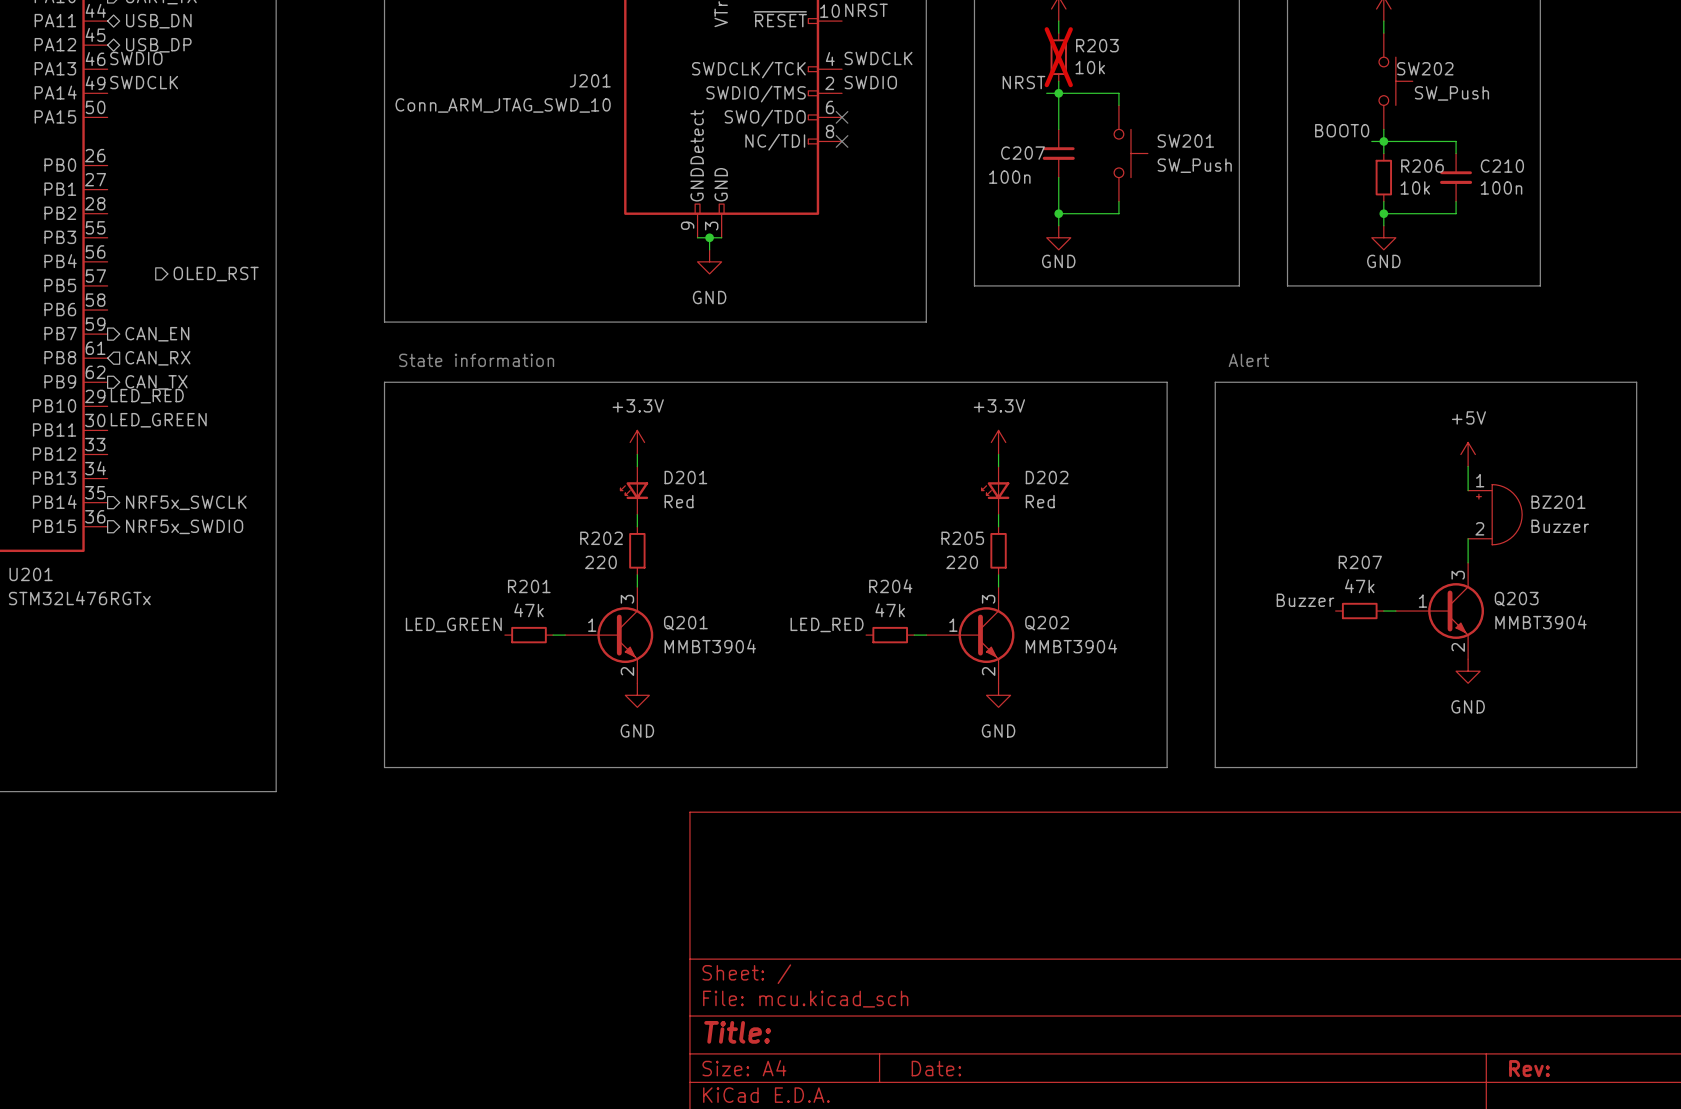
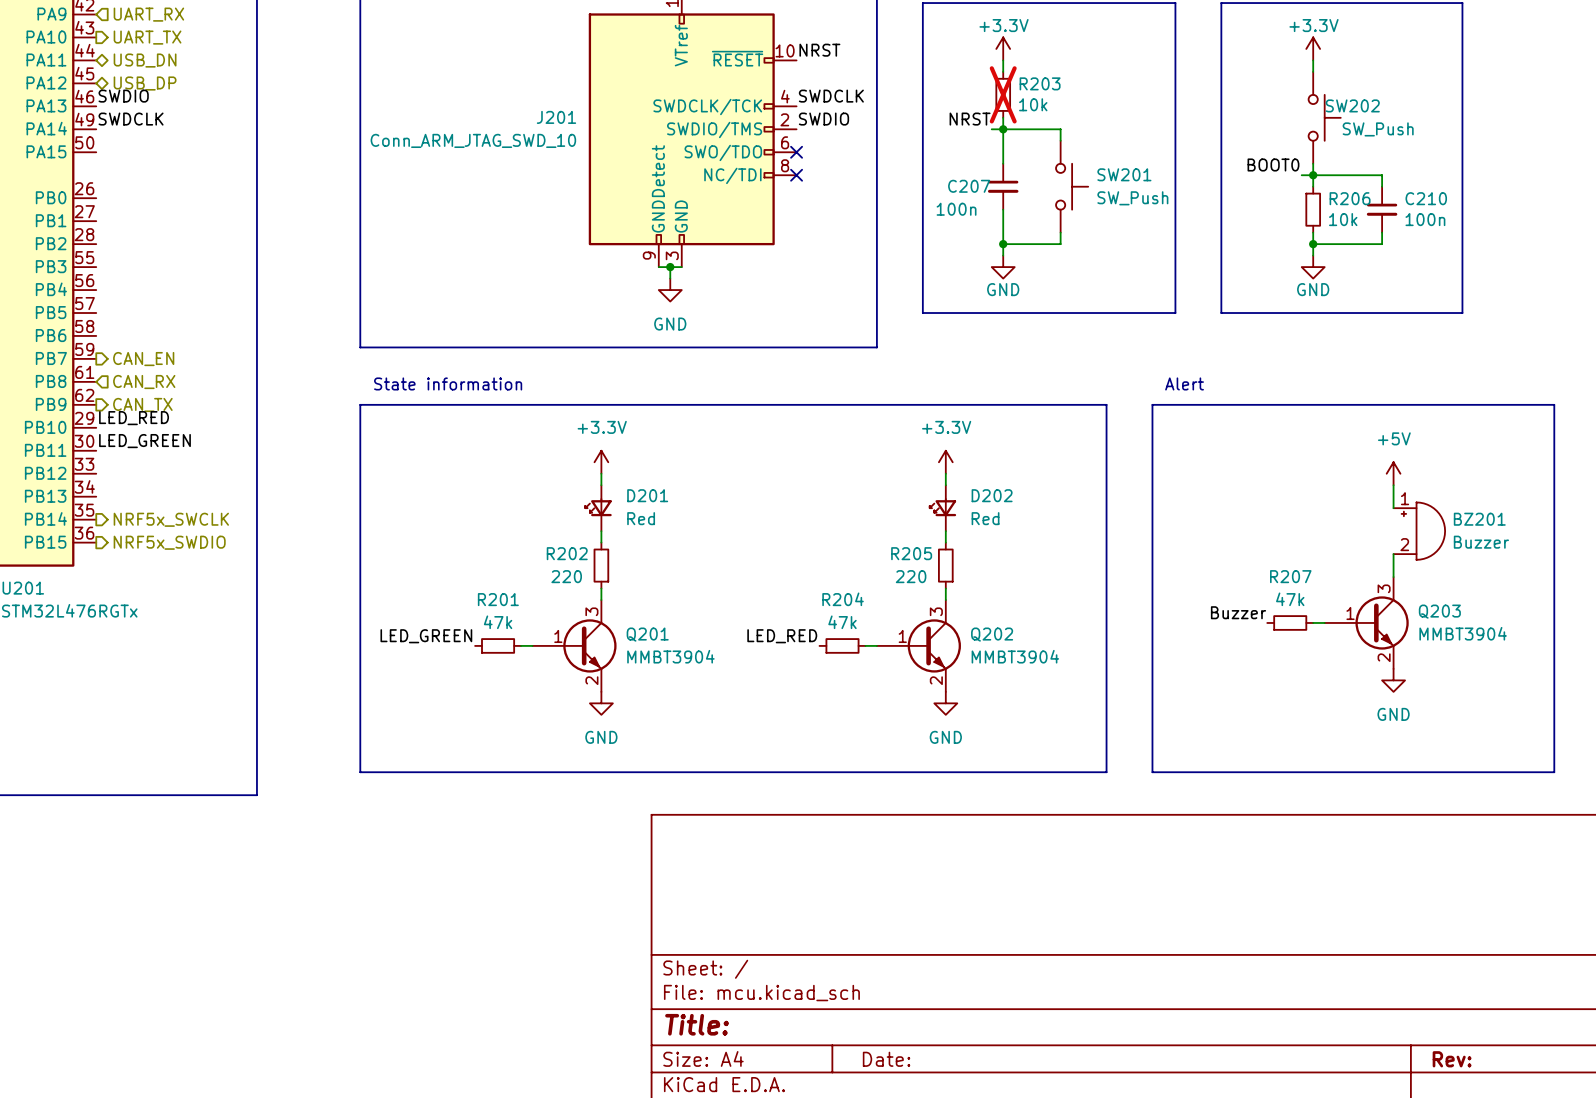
hierarchical label: OLED_RST (216, 274) -> none

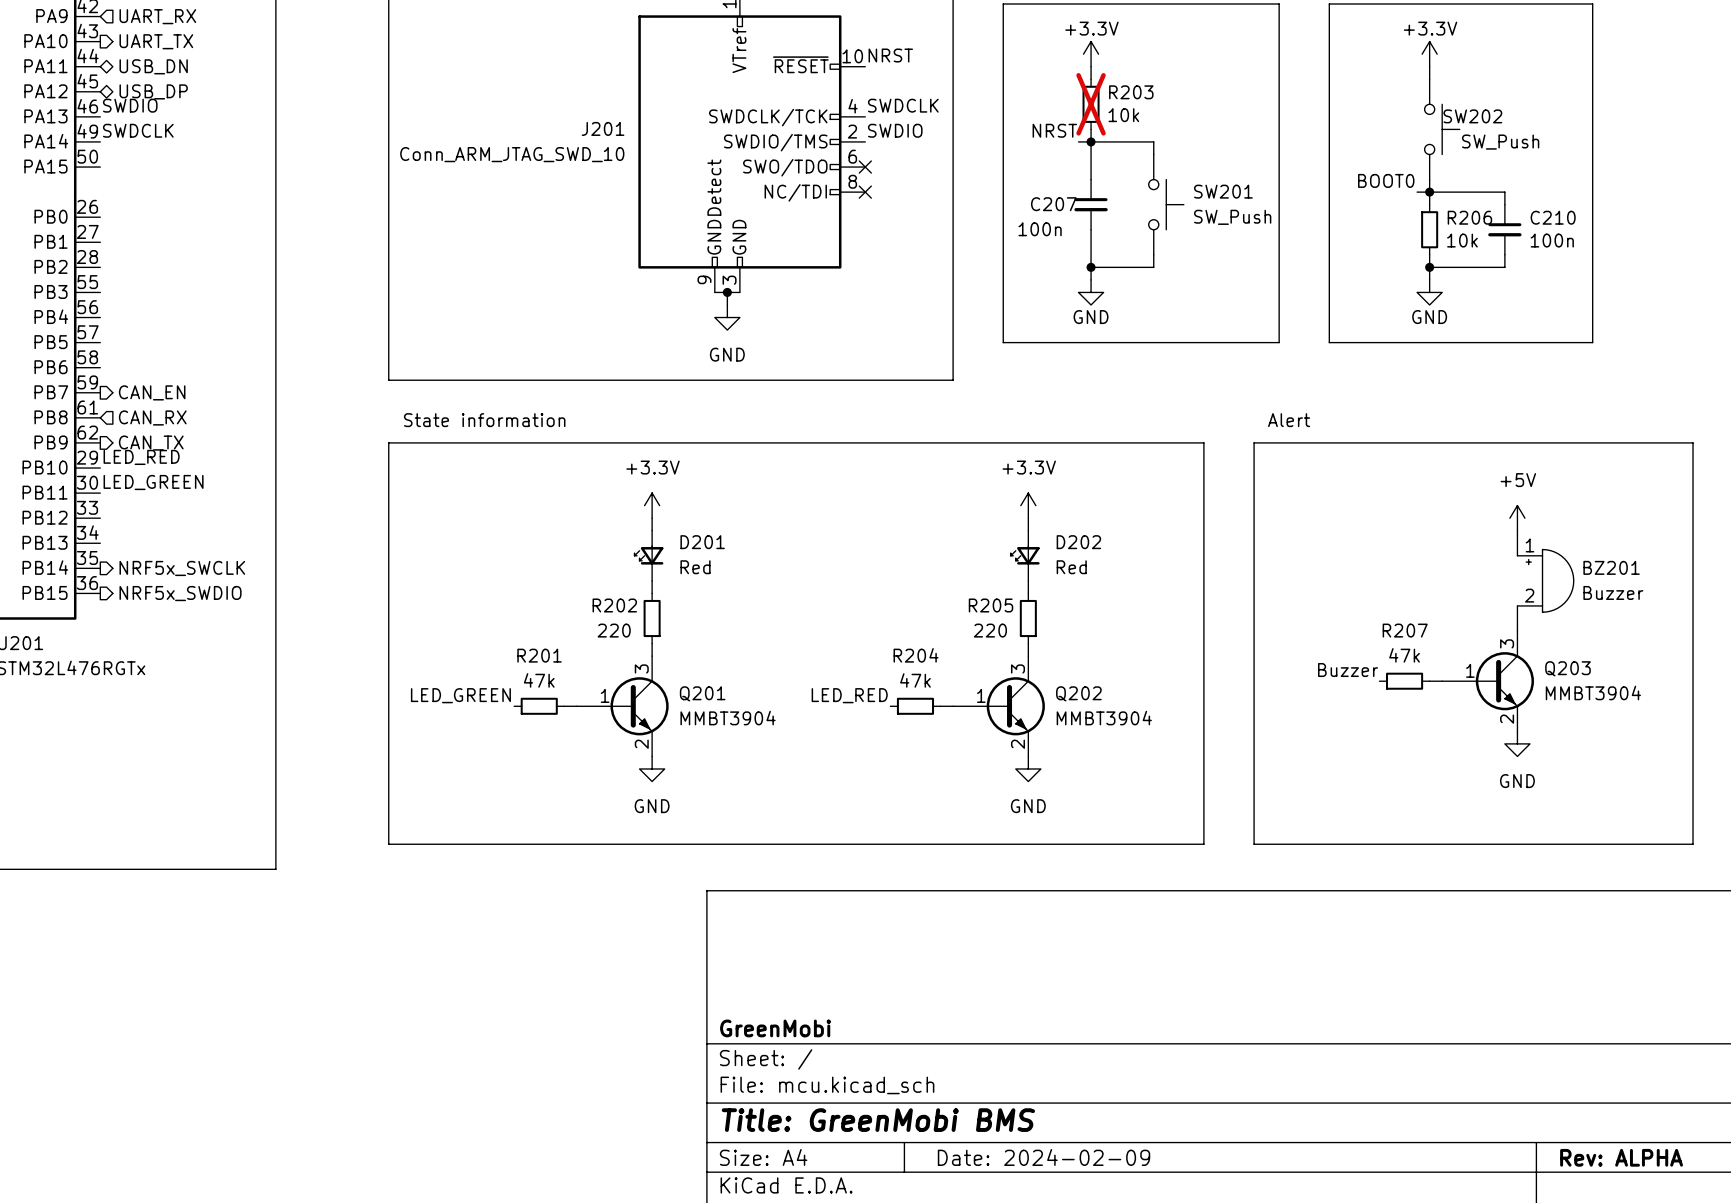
title block: none -> GreenMobi (775, 1028)
title block: Title: (697, 1024) -> Title: GreenMobi BMS (878, 1120)
title block: Date: (886, 1059) -> Date: 2024-02-09 (1044, 1157)
title block: Rev: (1452, 1059) -> Rev: ALPHA (1621, 1157)

